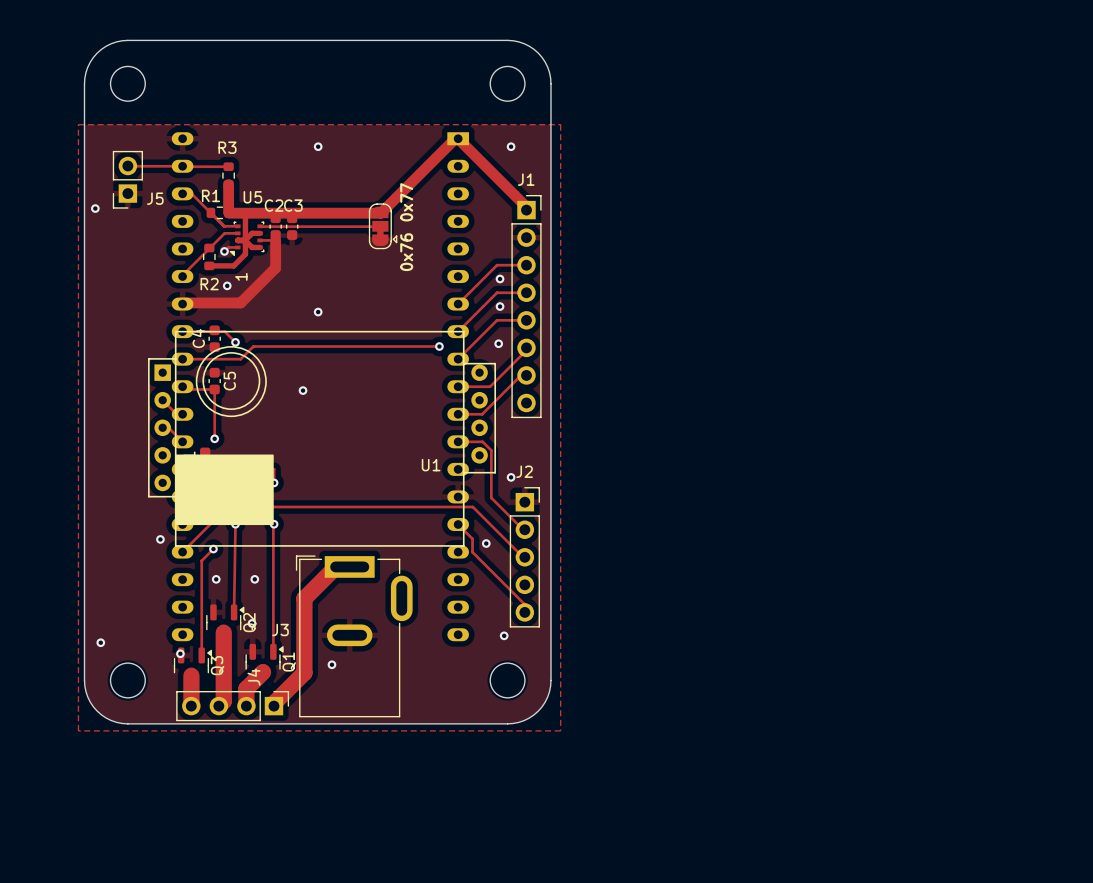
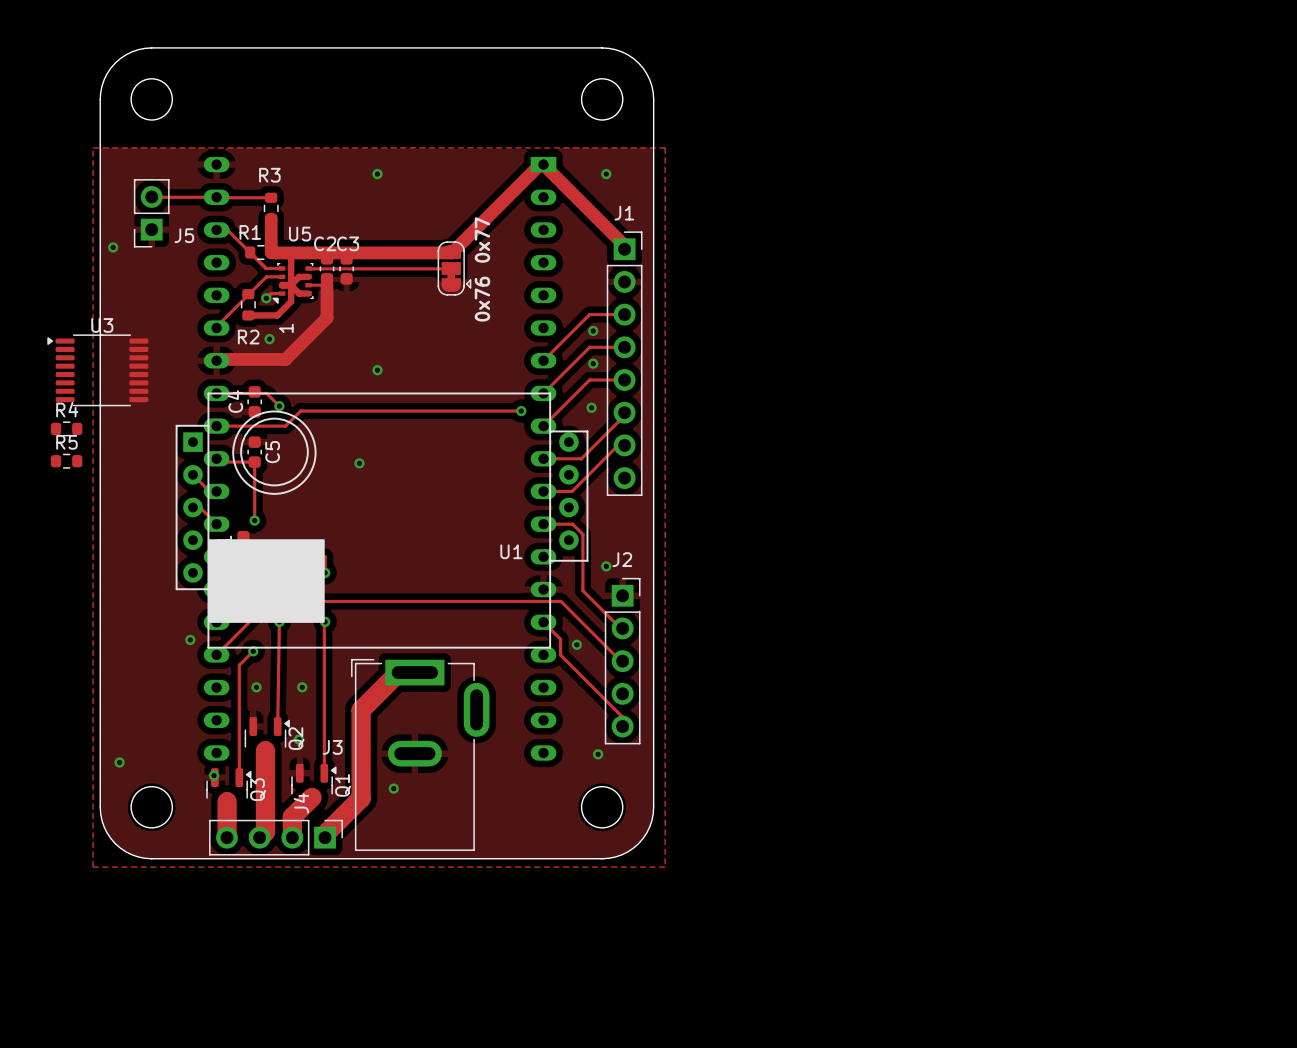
U3: none -> (97, 370)
R4: none -> (66, 428)
R5: none -> (66, 461)

